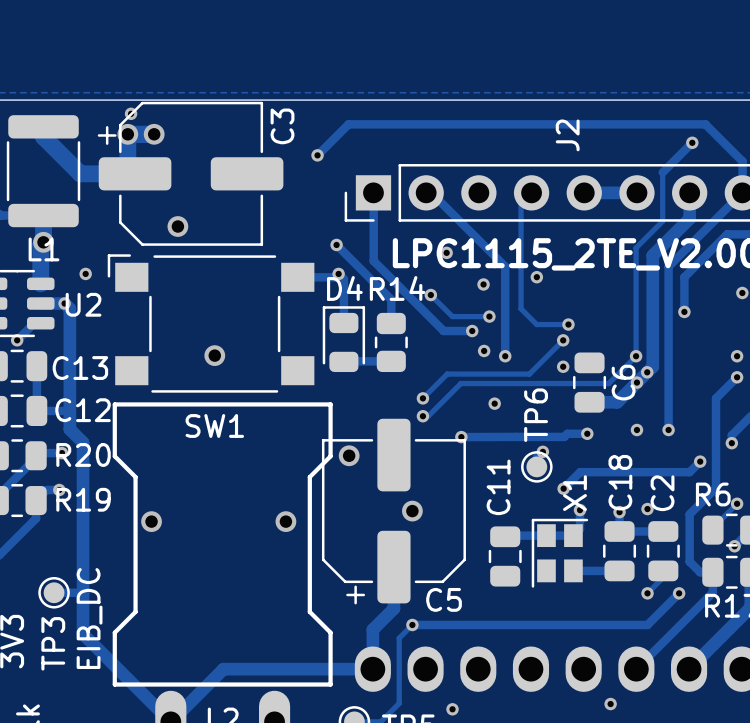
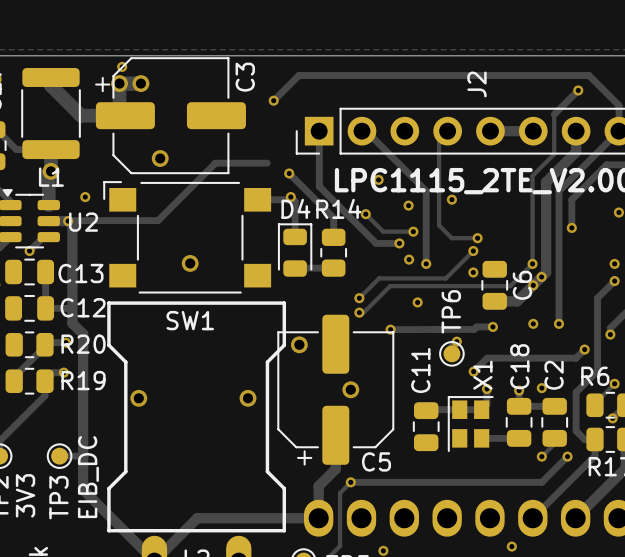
track: none -> (267, 163) (215, 163) (158, 220) (68, 221)

